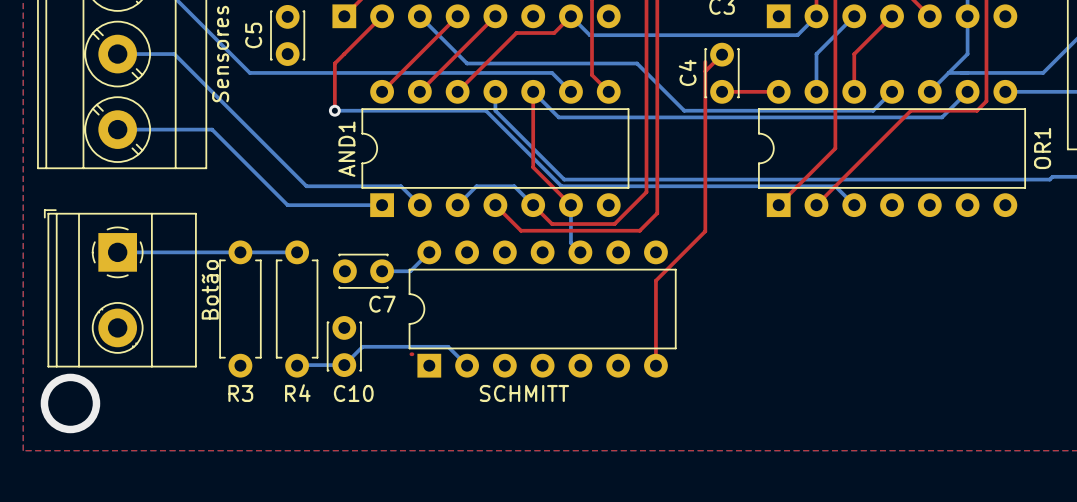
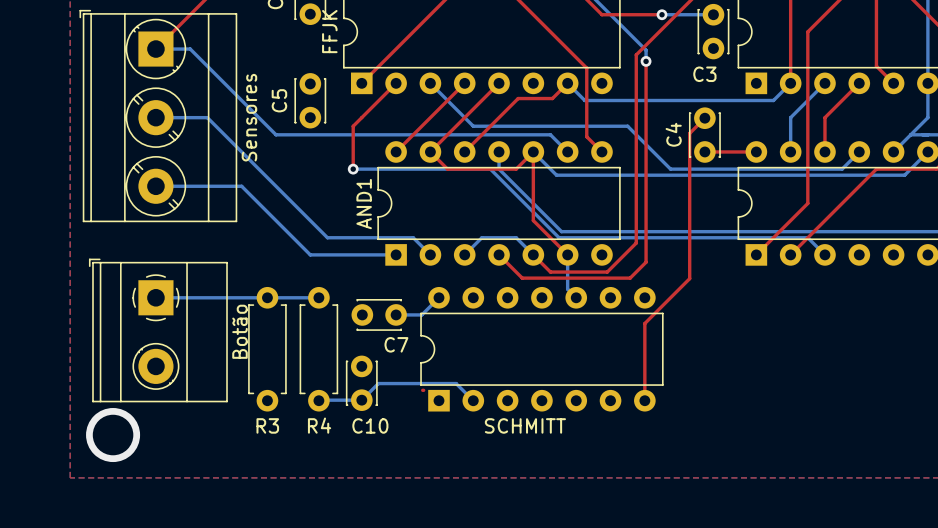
top track: (705, 61) (705, 71) -> none
top track: none -> (430, 151) (447, 169) (516, 169) (533, 151)

